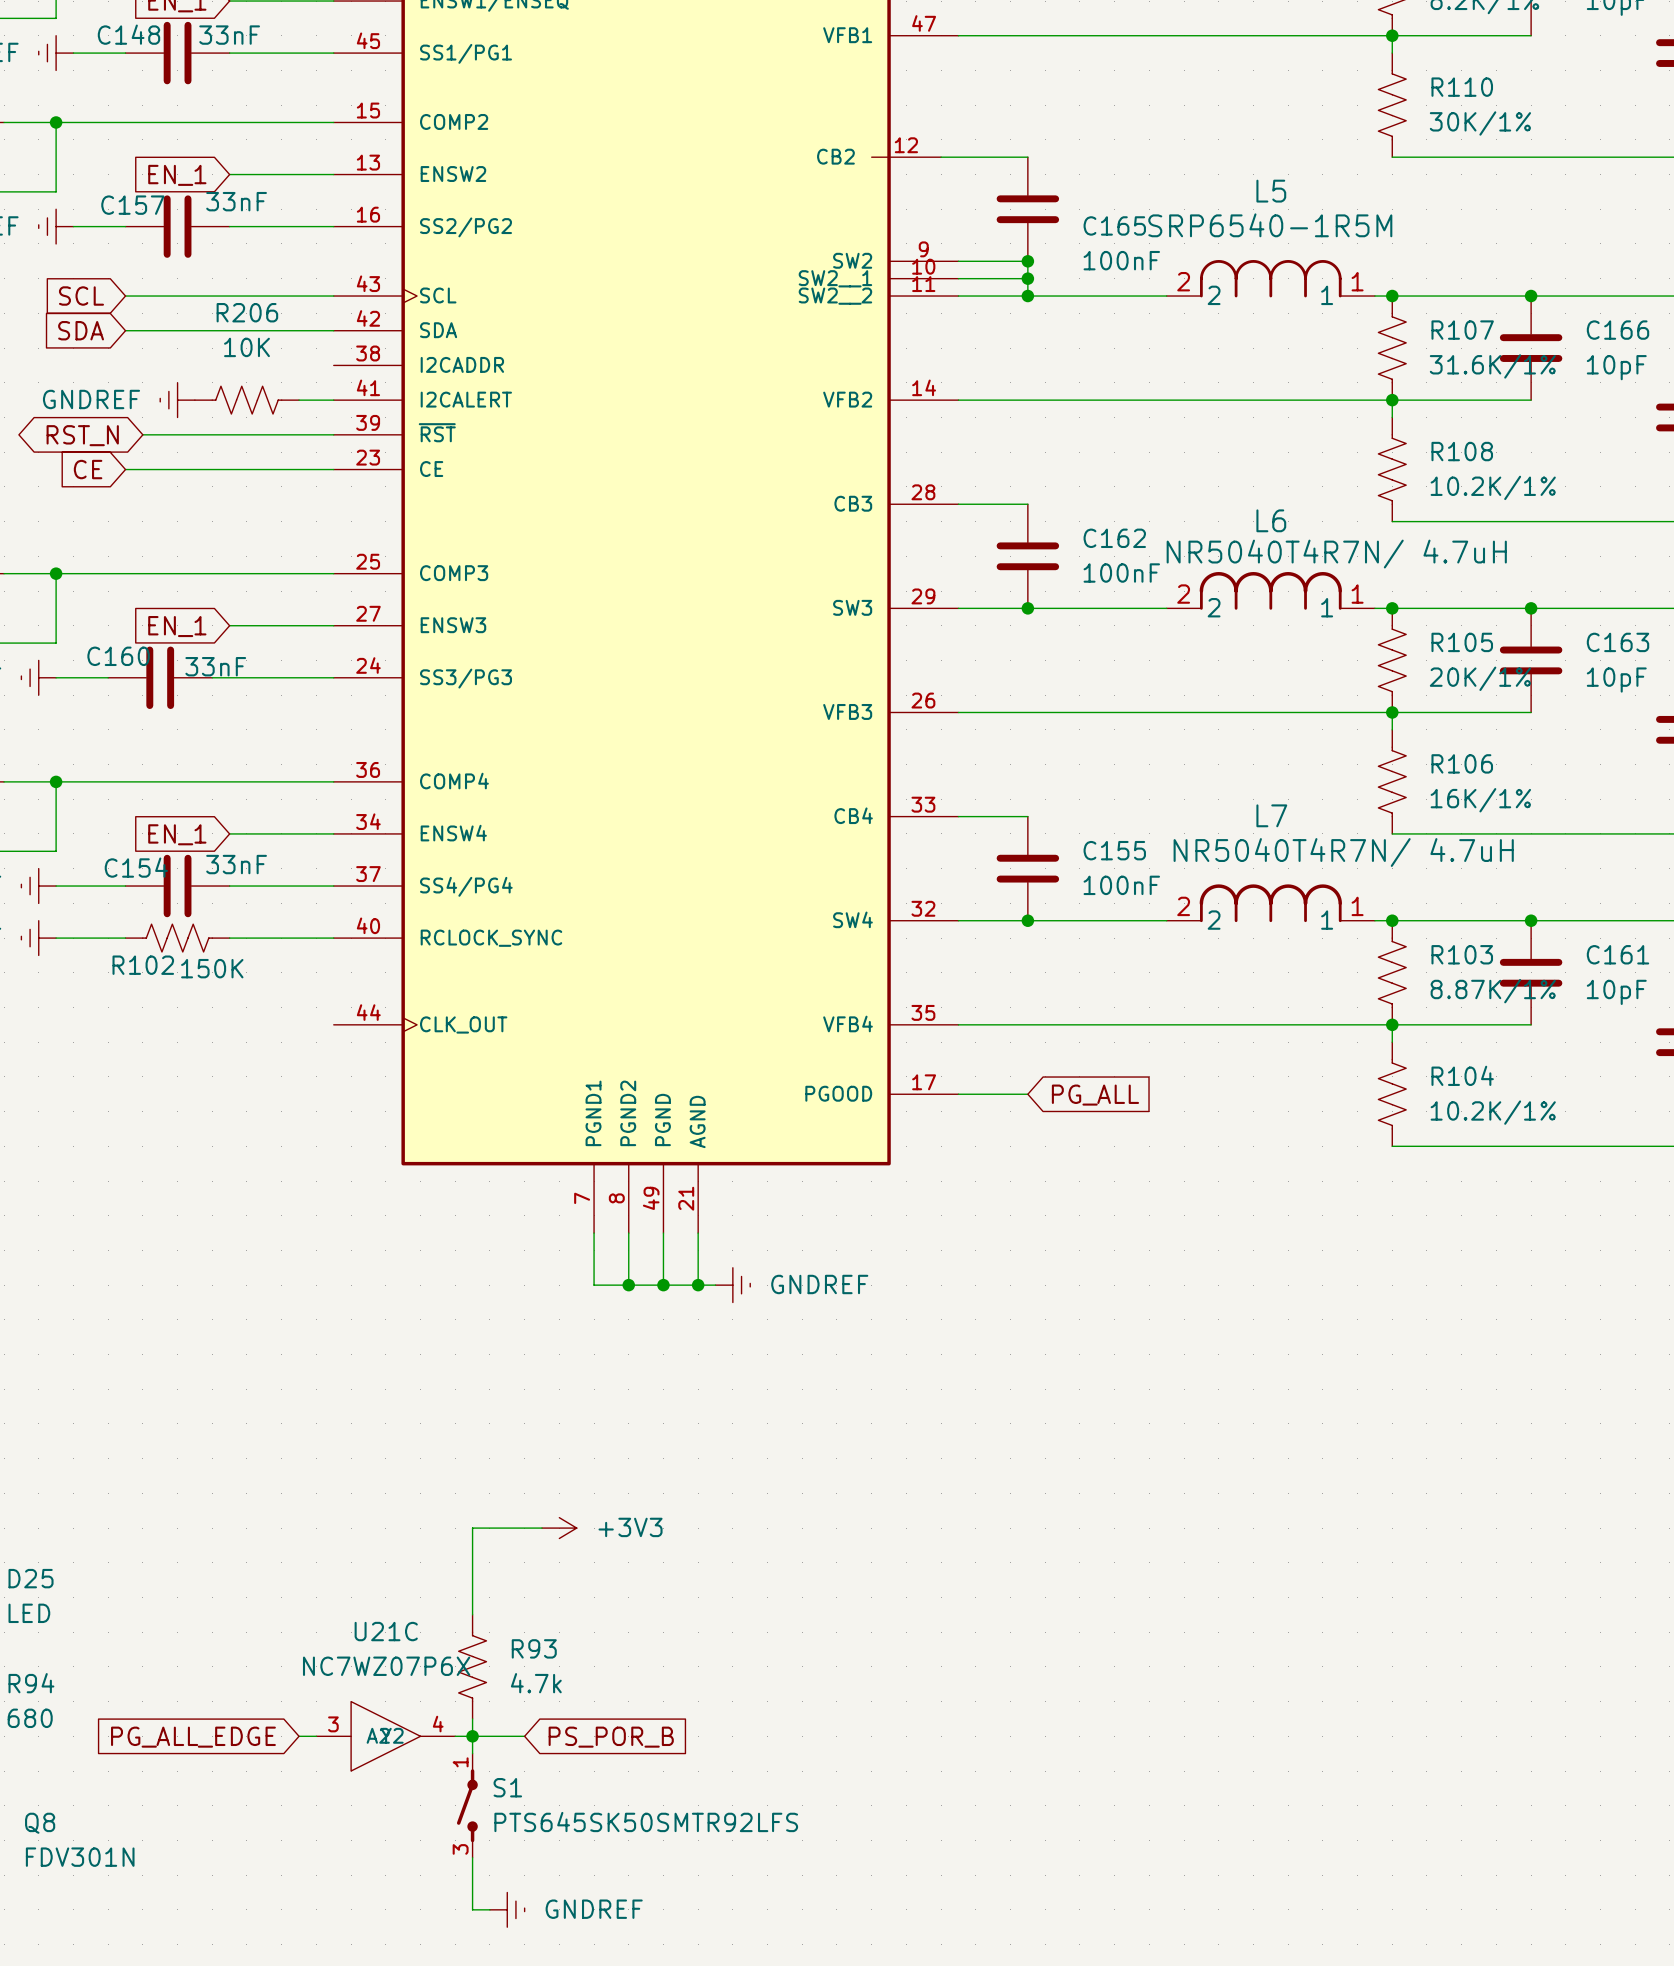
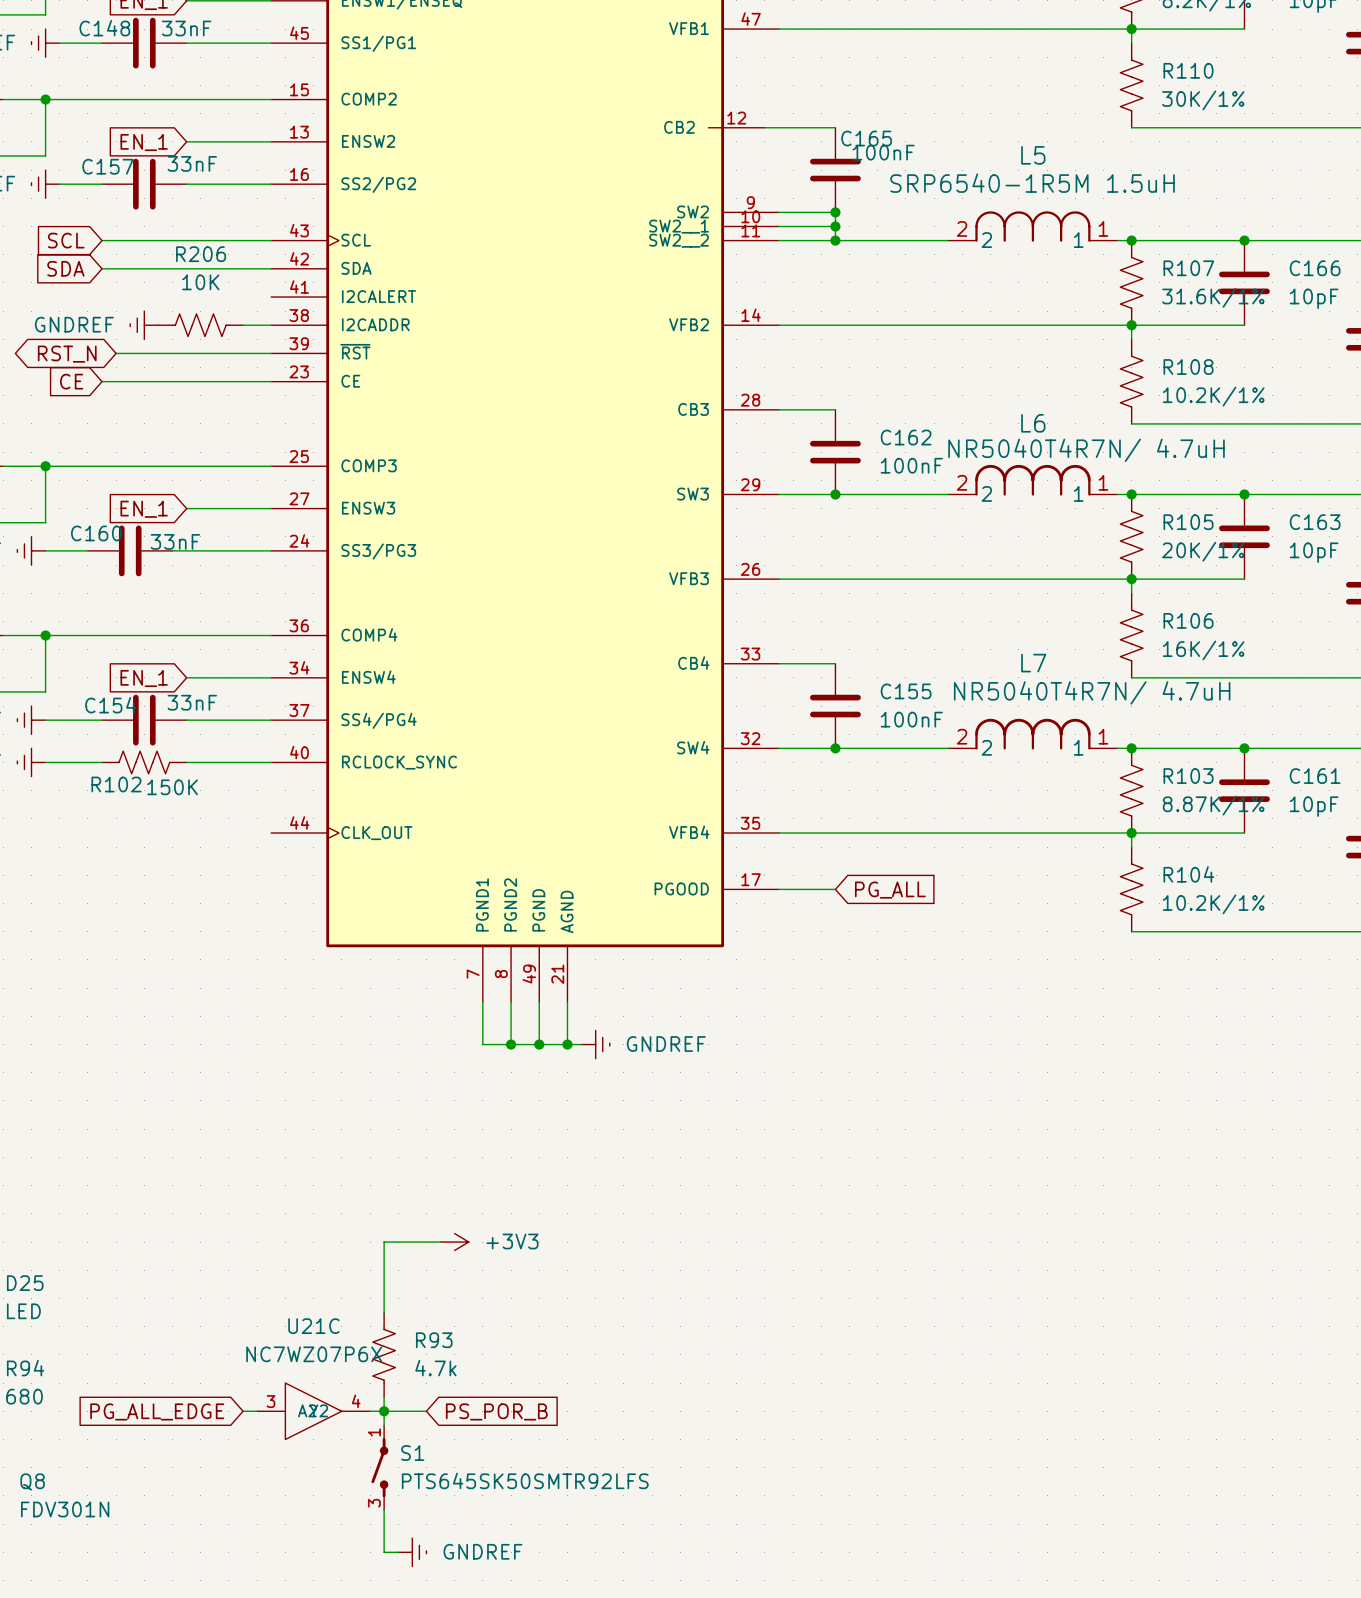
C165 name position: C165 (1114, 225) -> C165 (866, 138)
L5 value: SRP6540-1R5M (1270, 225) -> SRP6540-1R5M 1.5uH (1032, 183)
C165 value position: 100nF (1121, 260) -> 100nF (883, 152)
part pin number: 38 (368, 353) -> 41 (299, 287)
part pin name: I2CADDR (462, 364) -> I2CALERT (379, 296)
part pin number: 41 (368, 387) -> 38 (299, 315)
part pin name: I2CALERT (466, 399) -> I2CADDR (375, 324)

